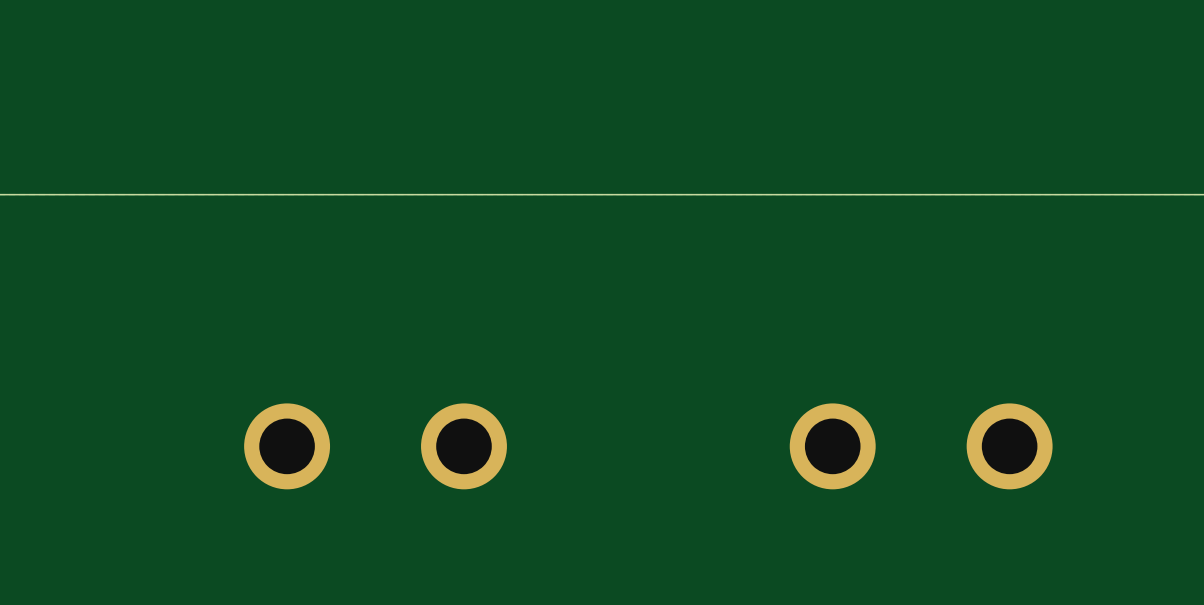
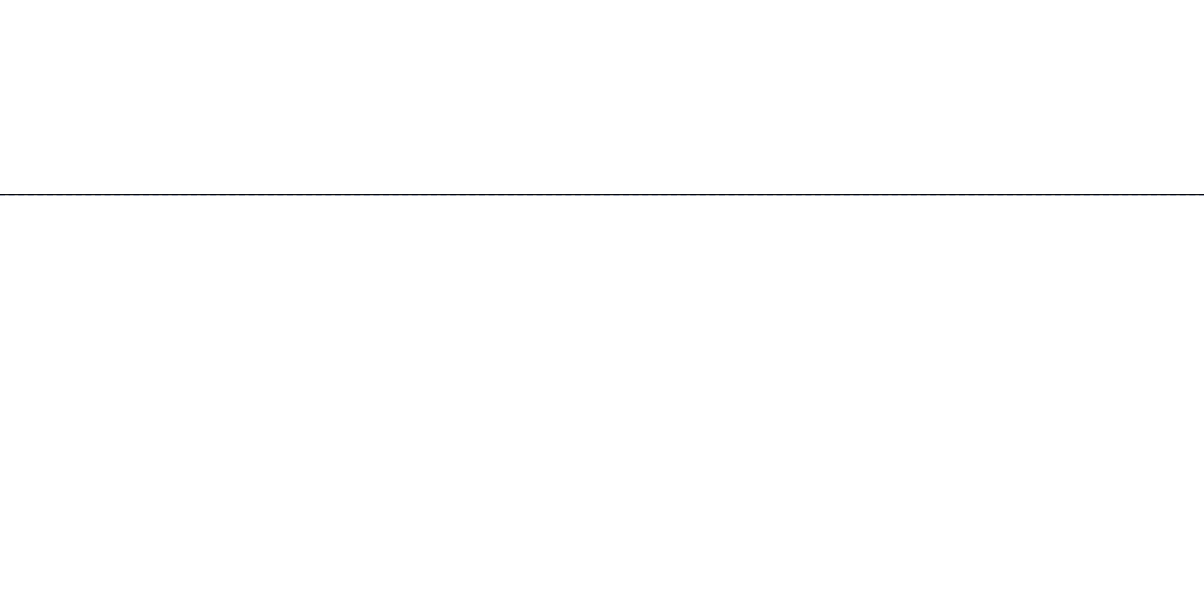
part: (375, 446) -> none
part: (921, 446) -> none

